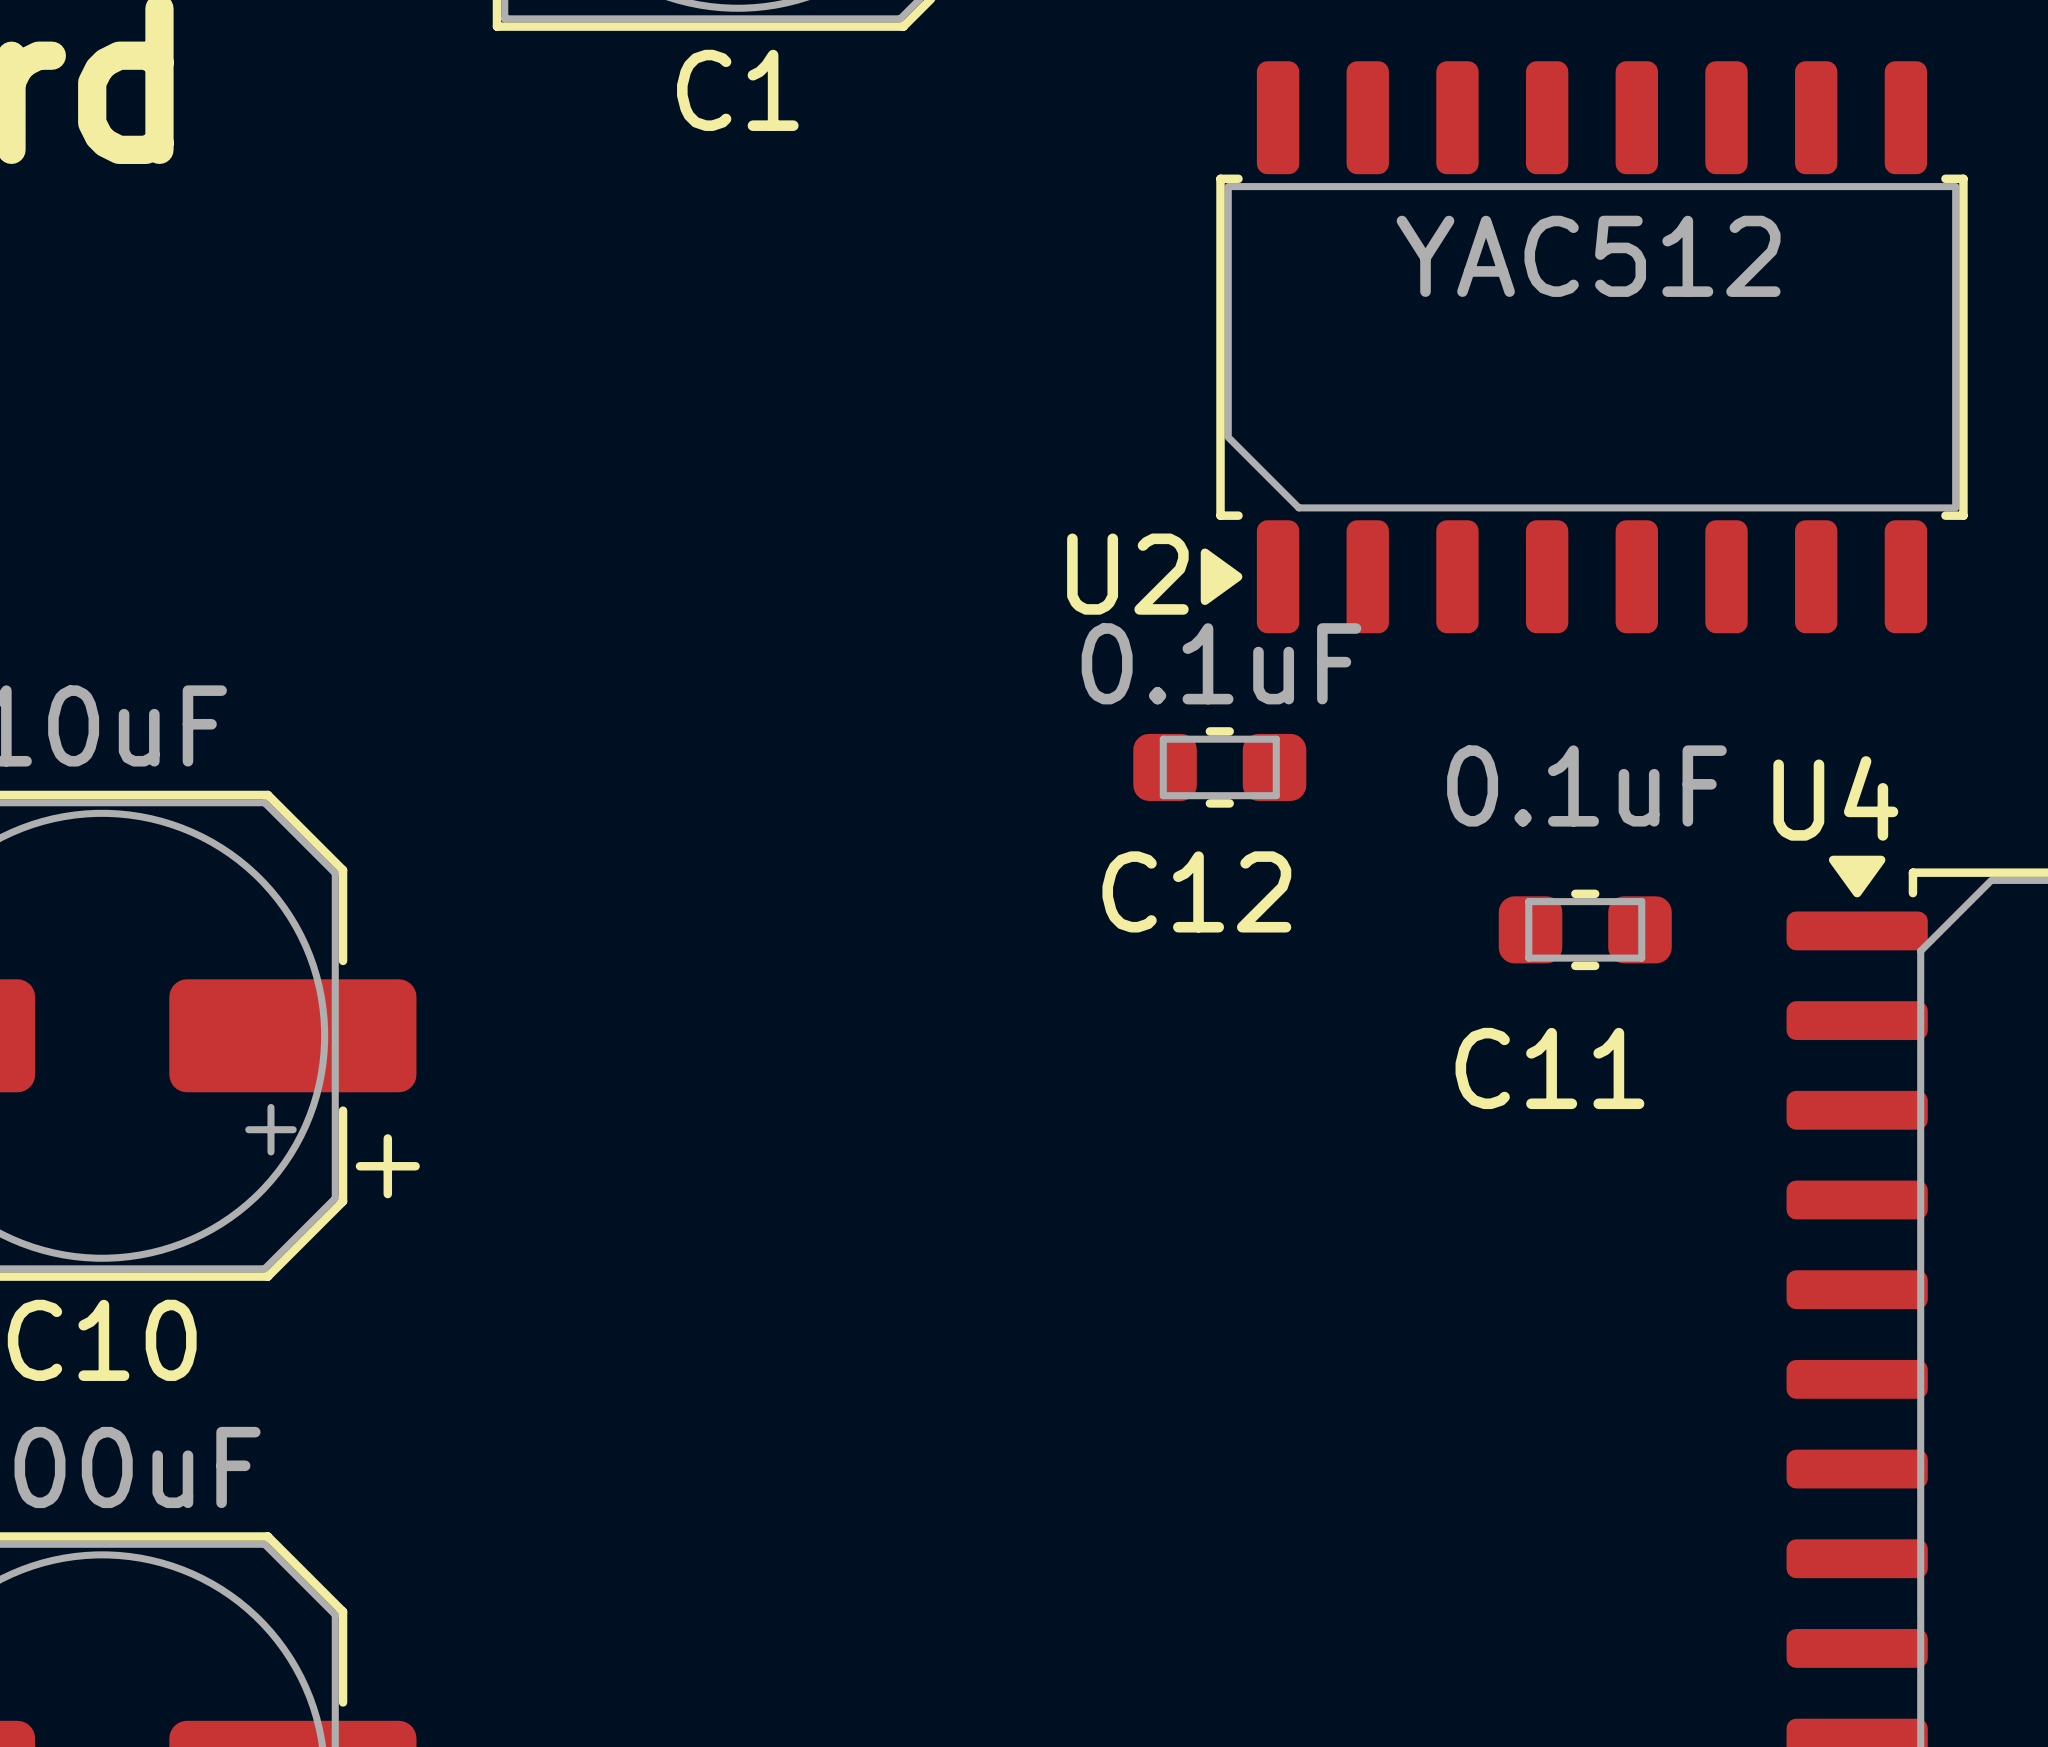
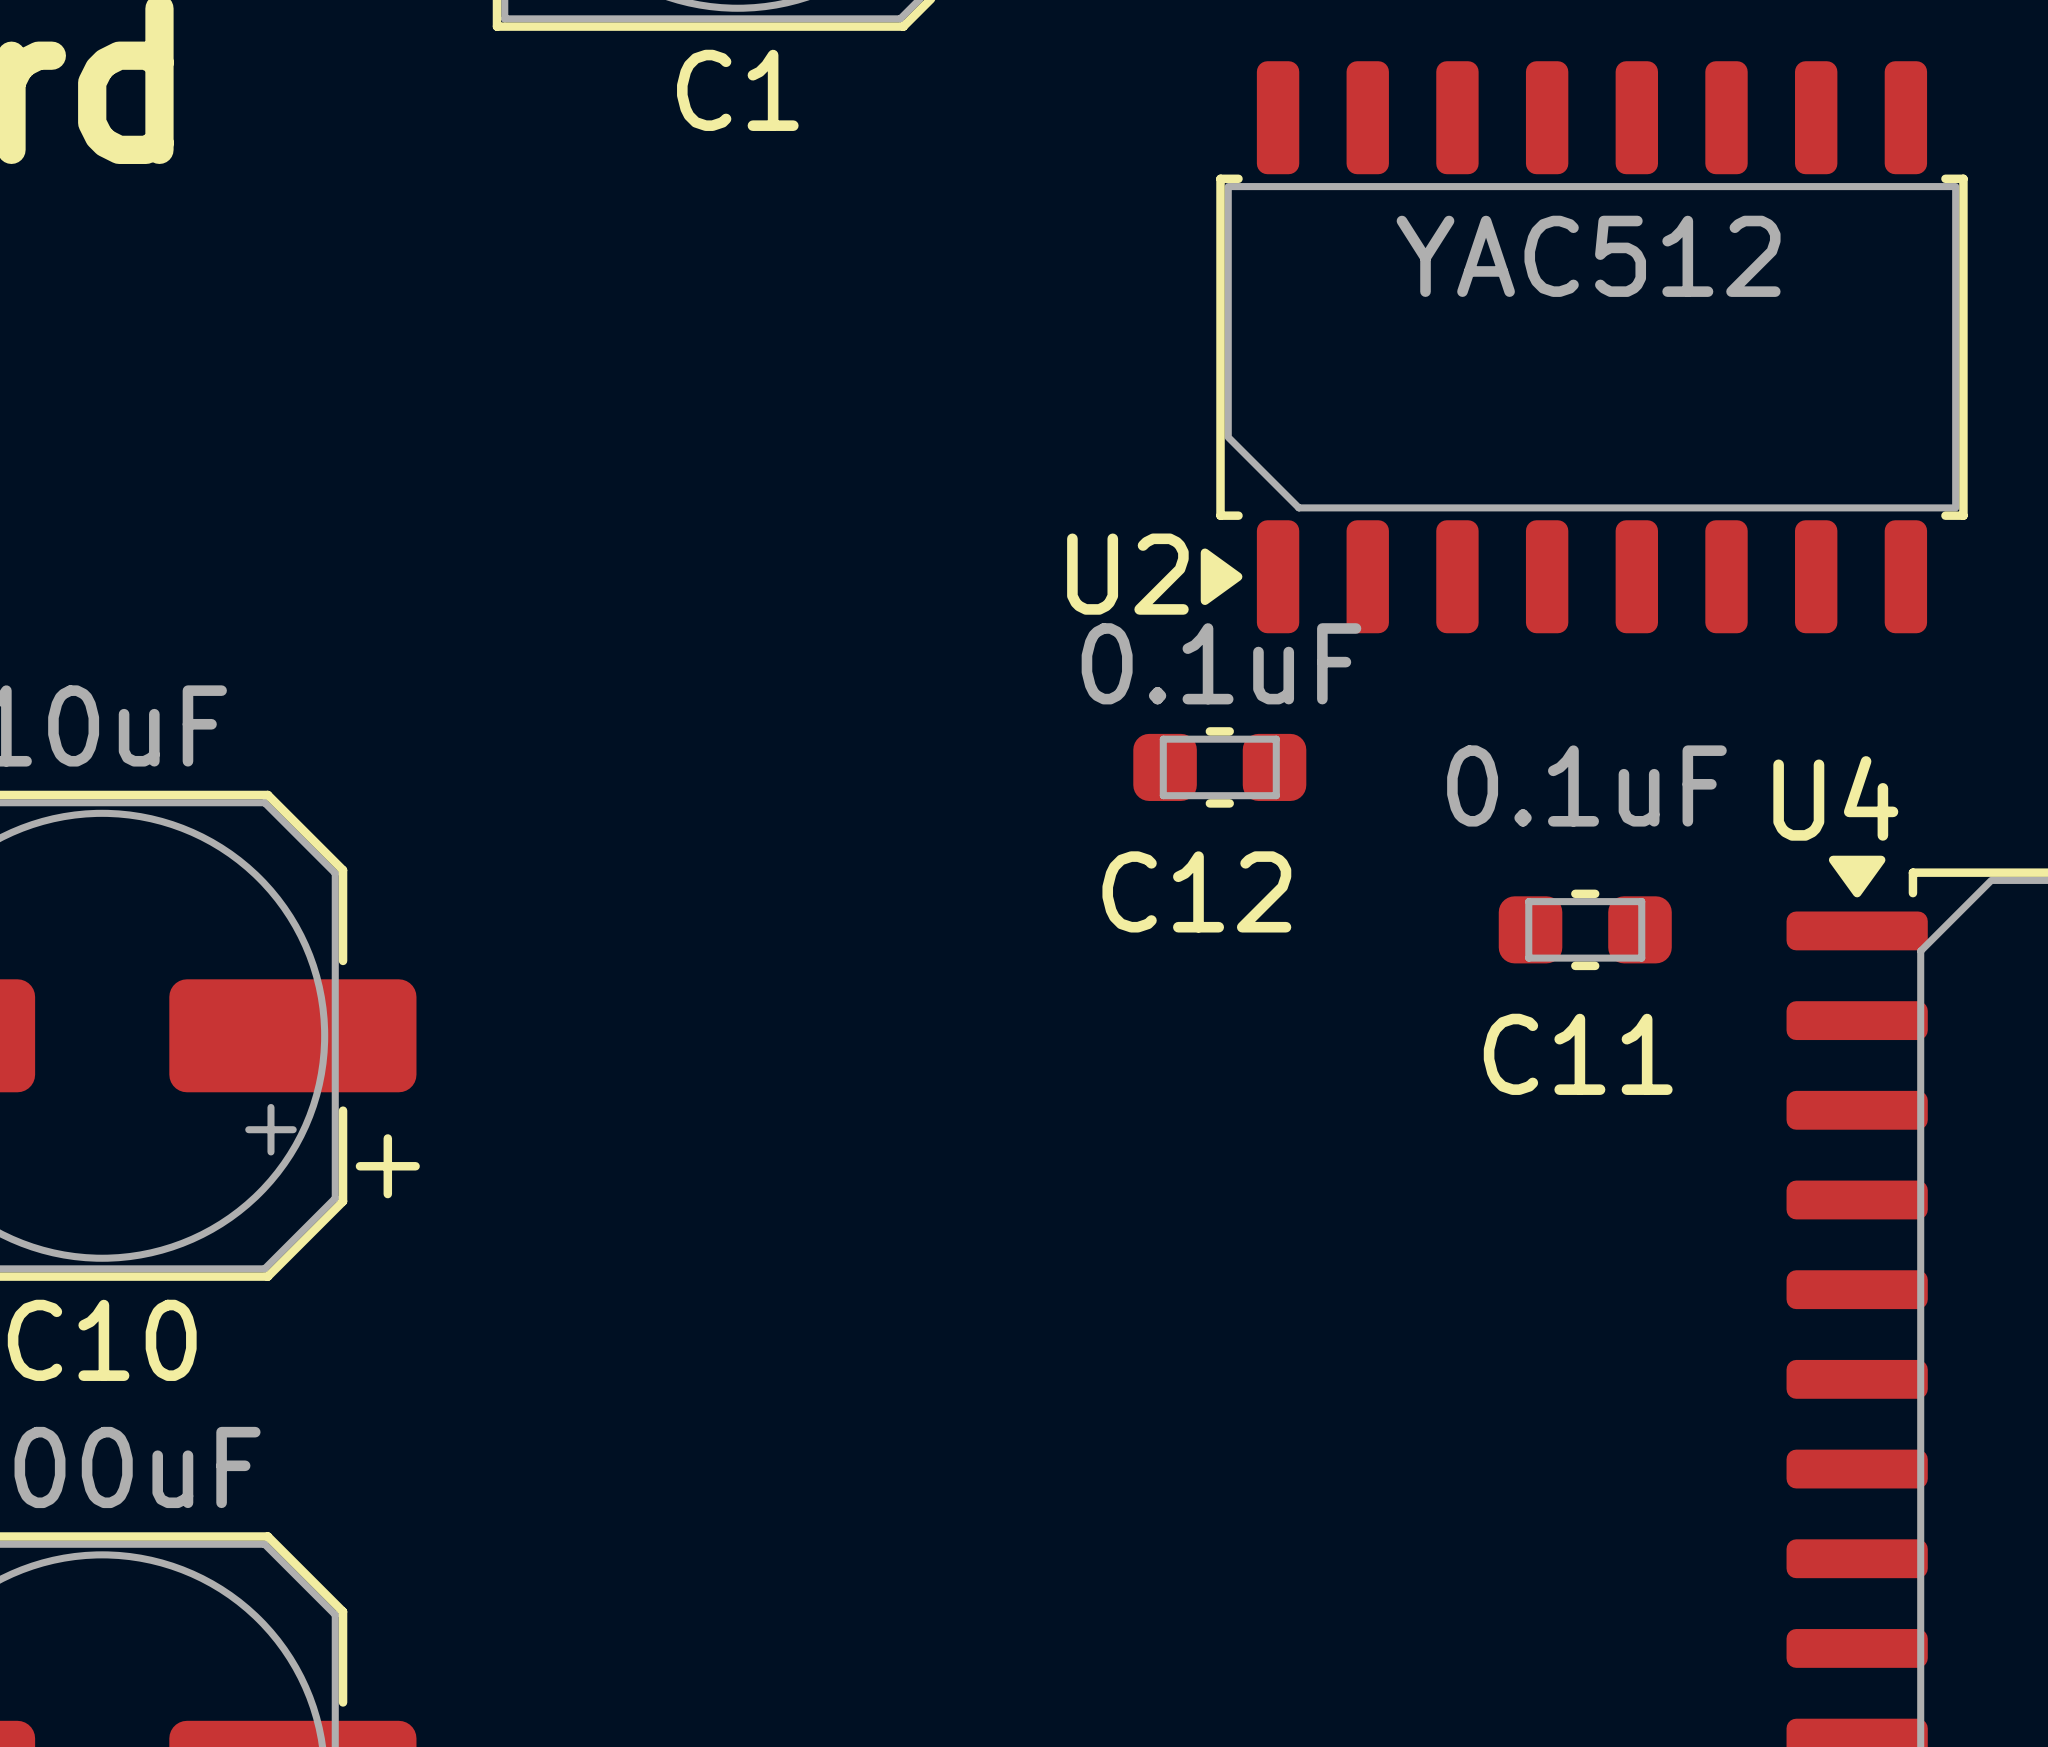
C11 name position: C11 (1549, 1068) -> C11 (1578, 1054)

